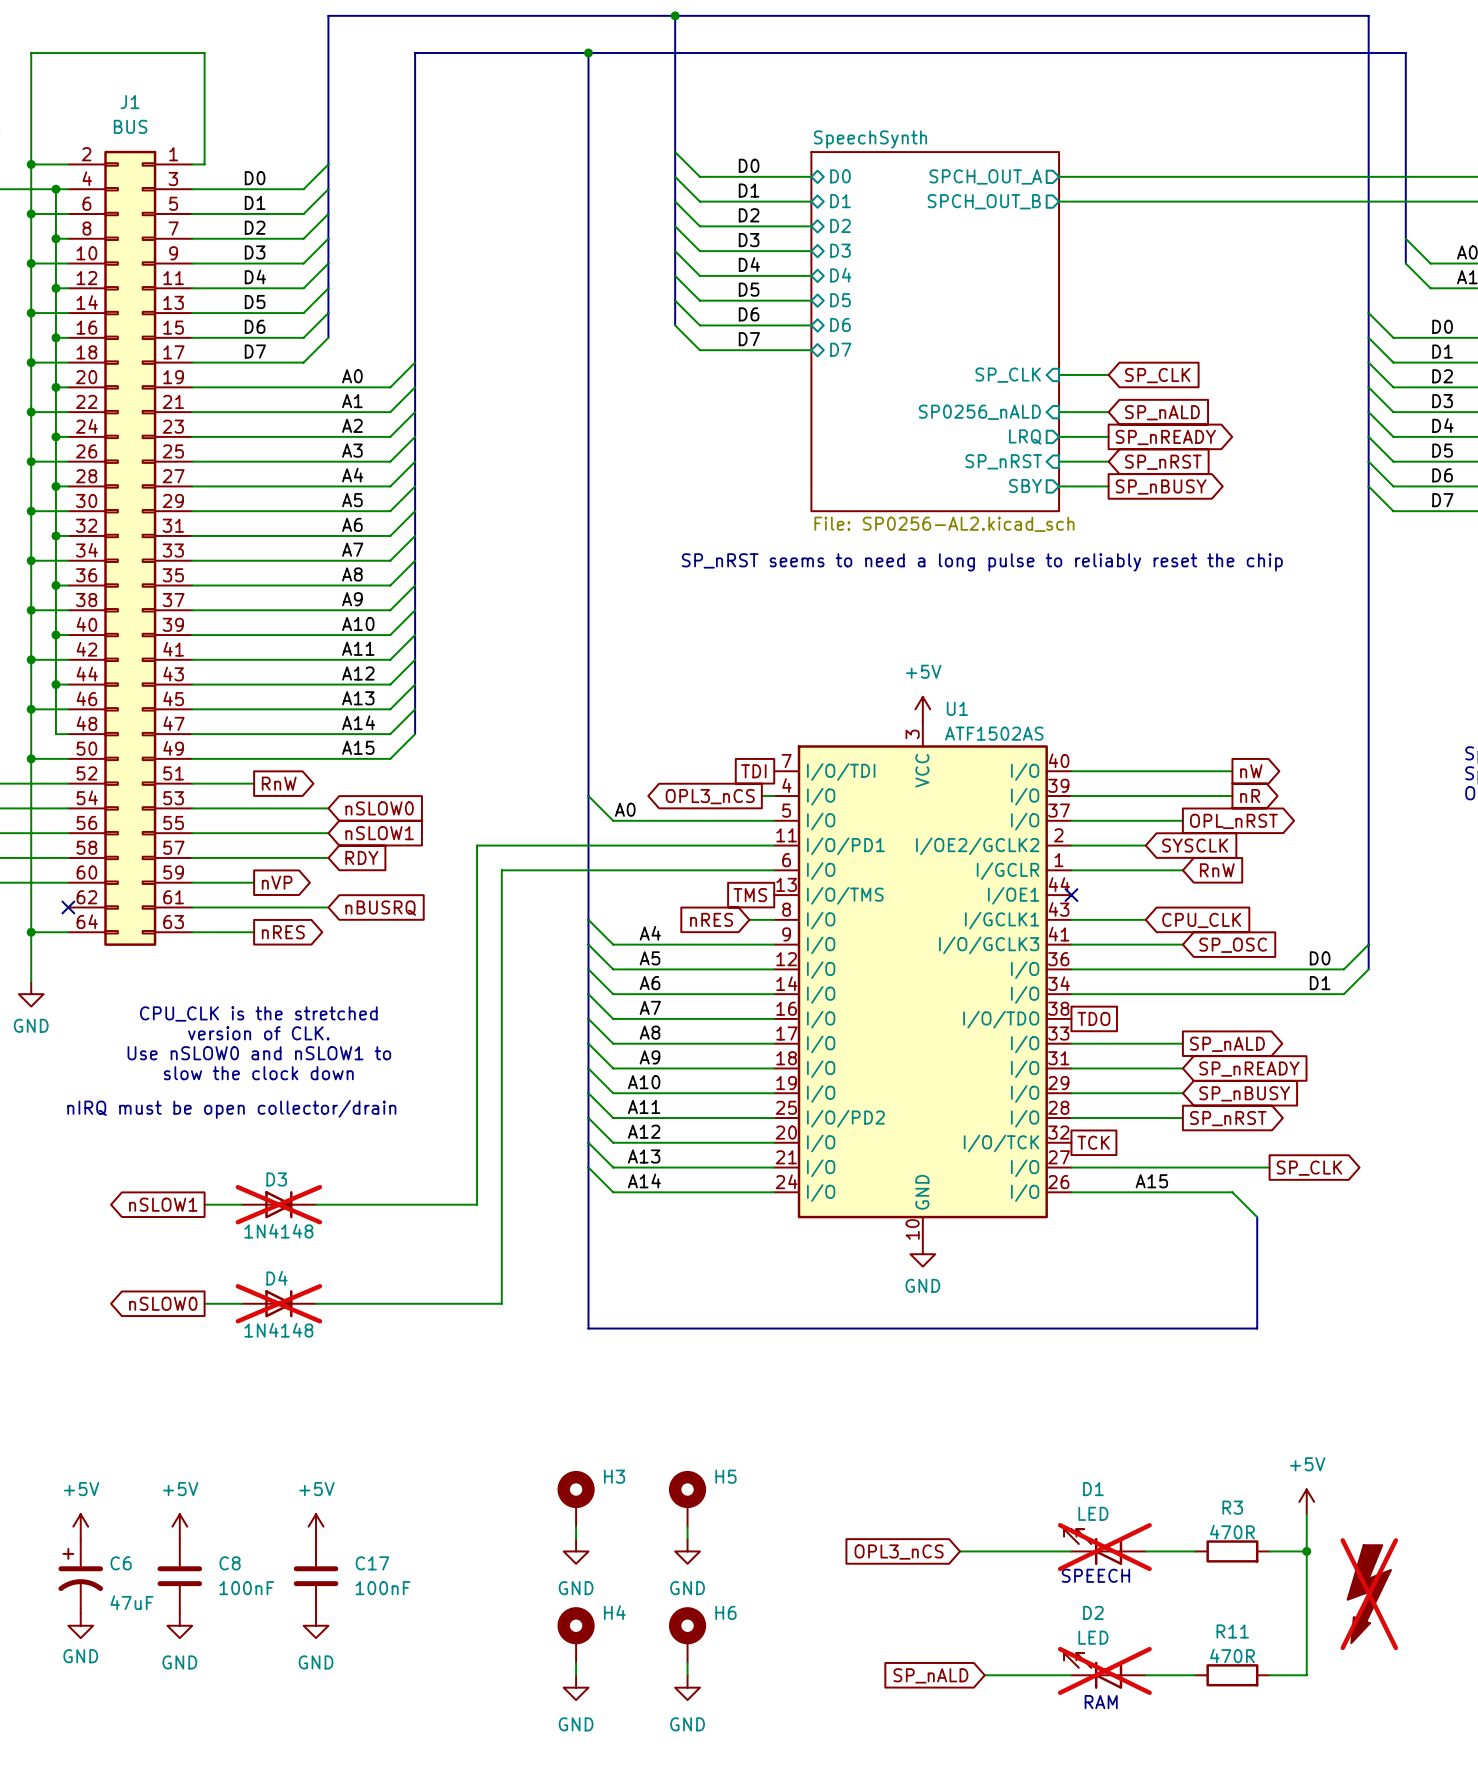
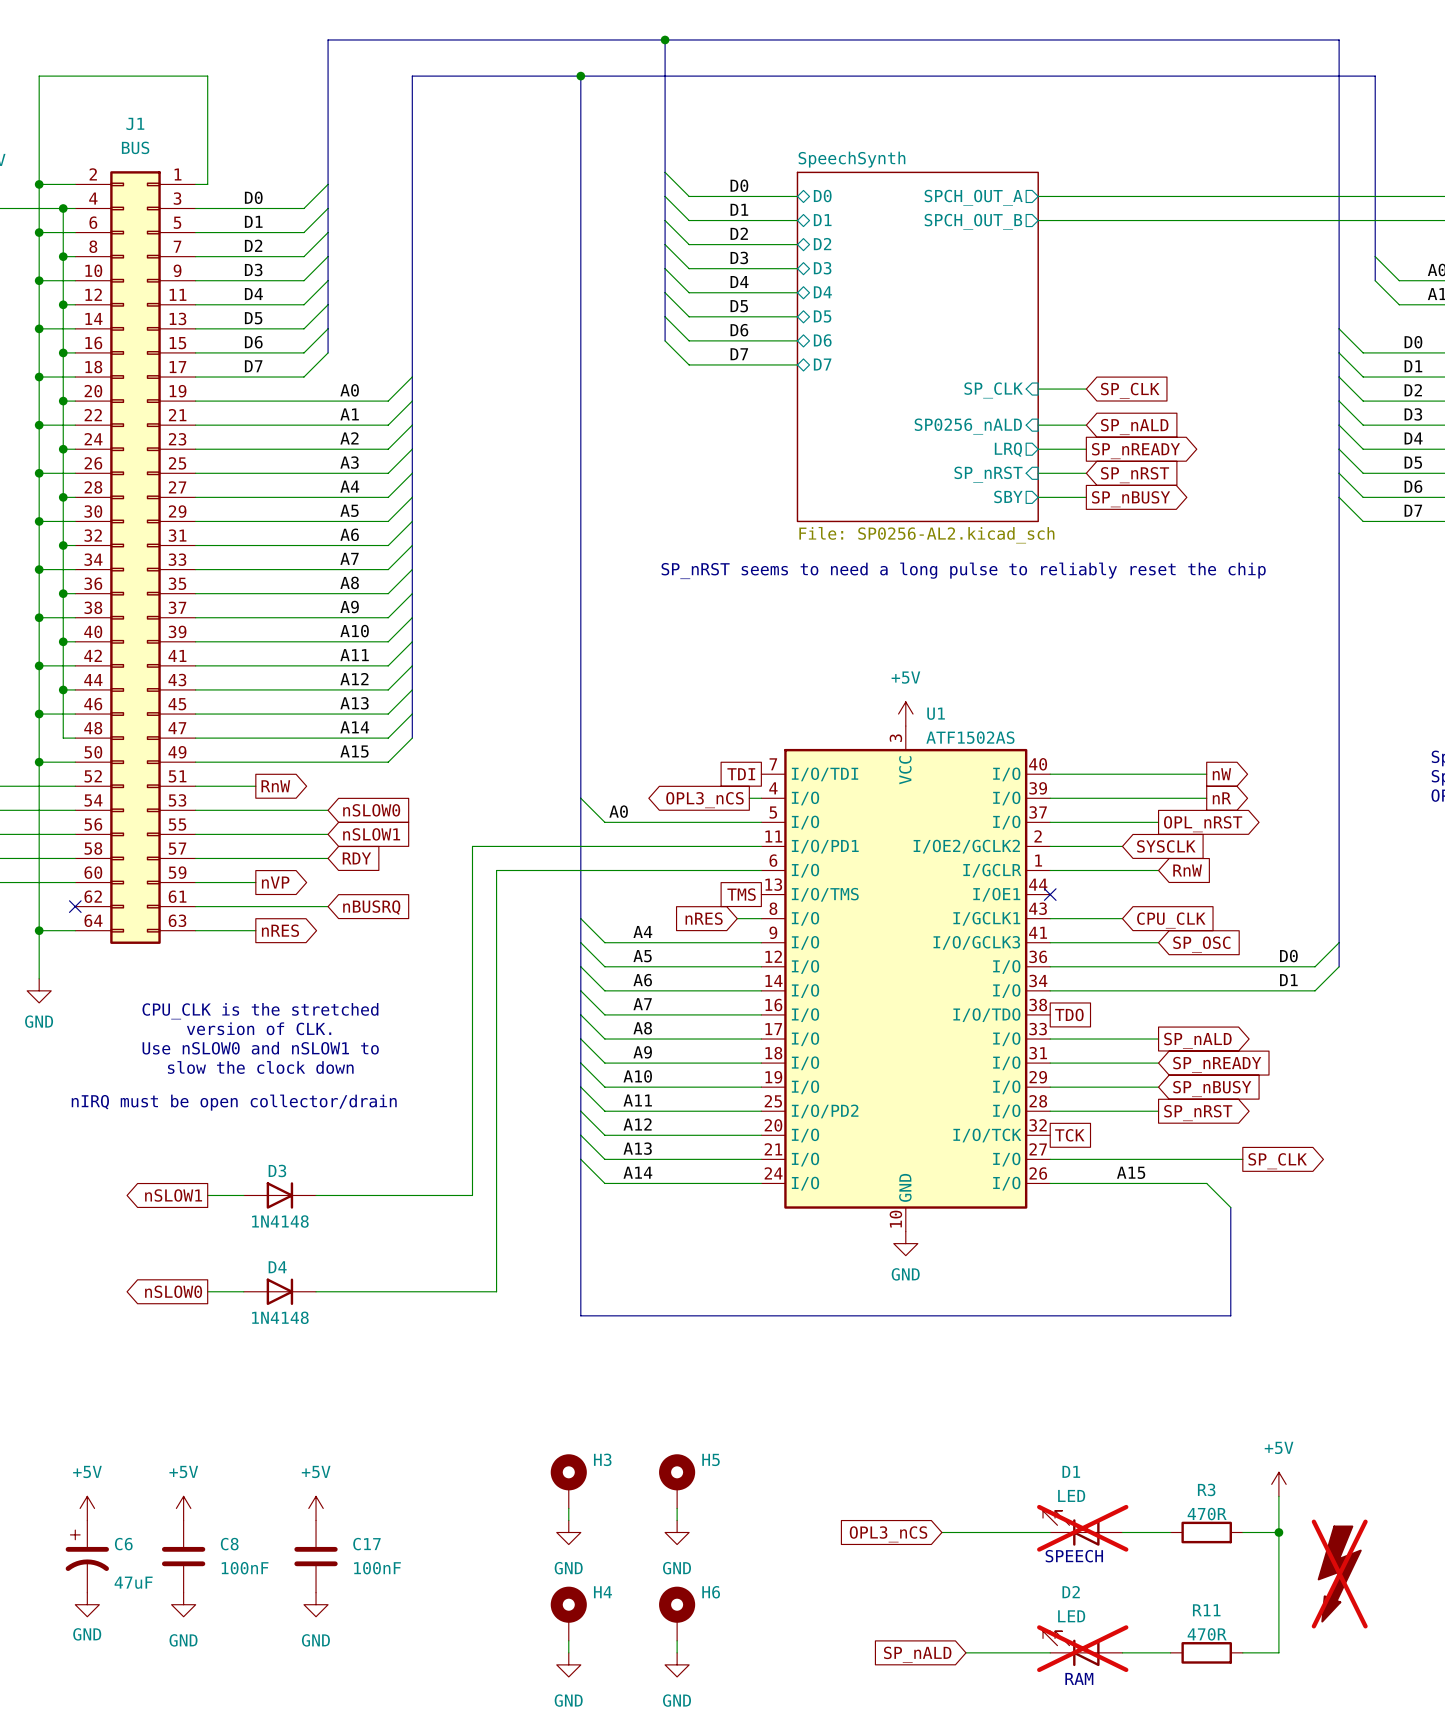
D3 do-not-place cross: (278, 1204) -> none
D4 do-not-place cross: (278, 1303) -> none

